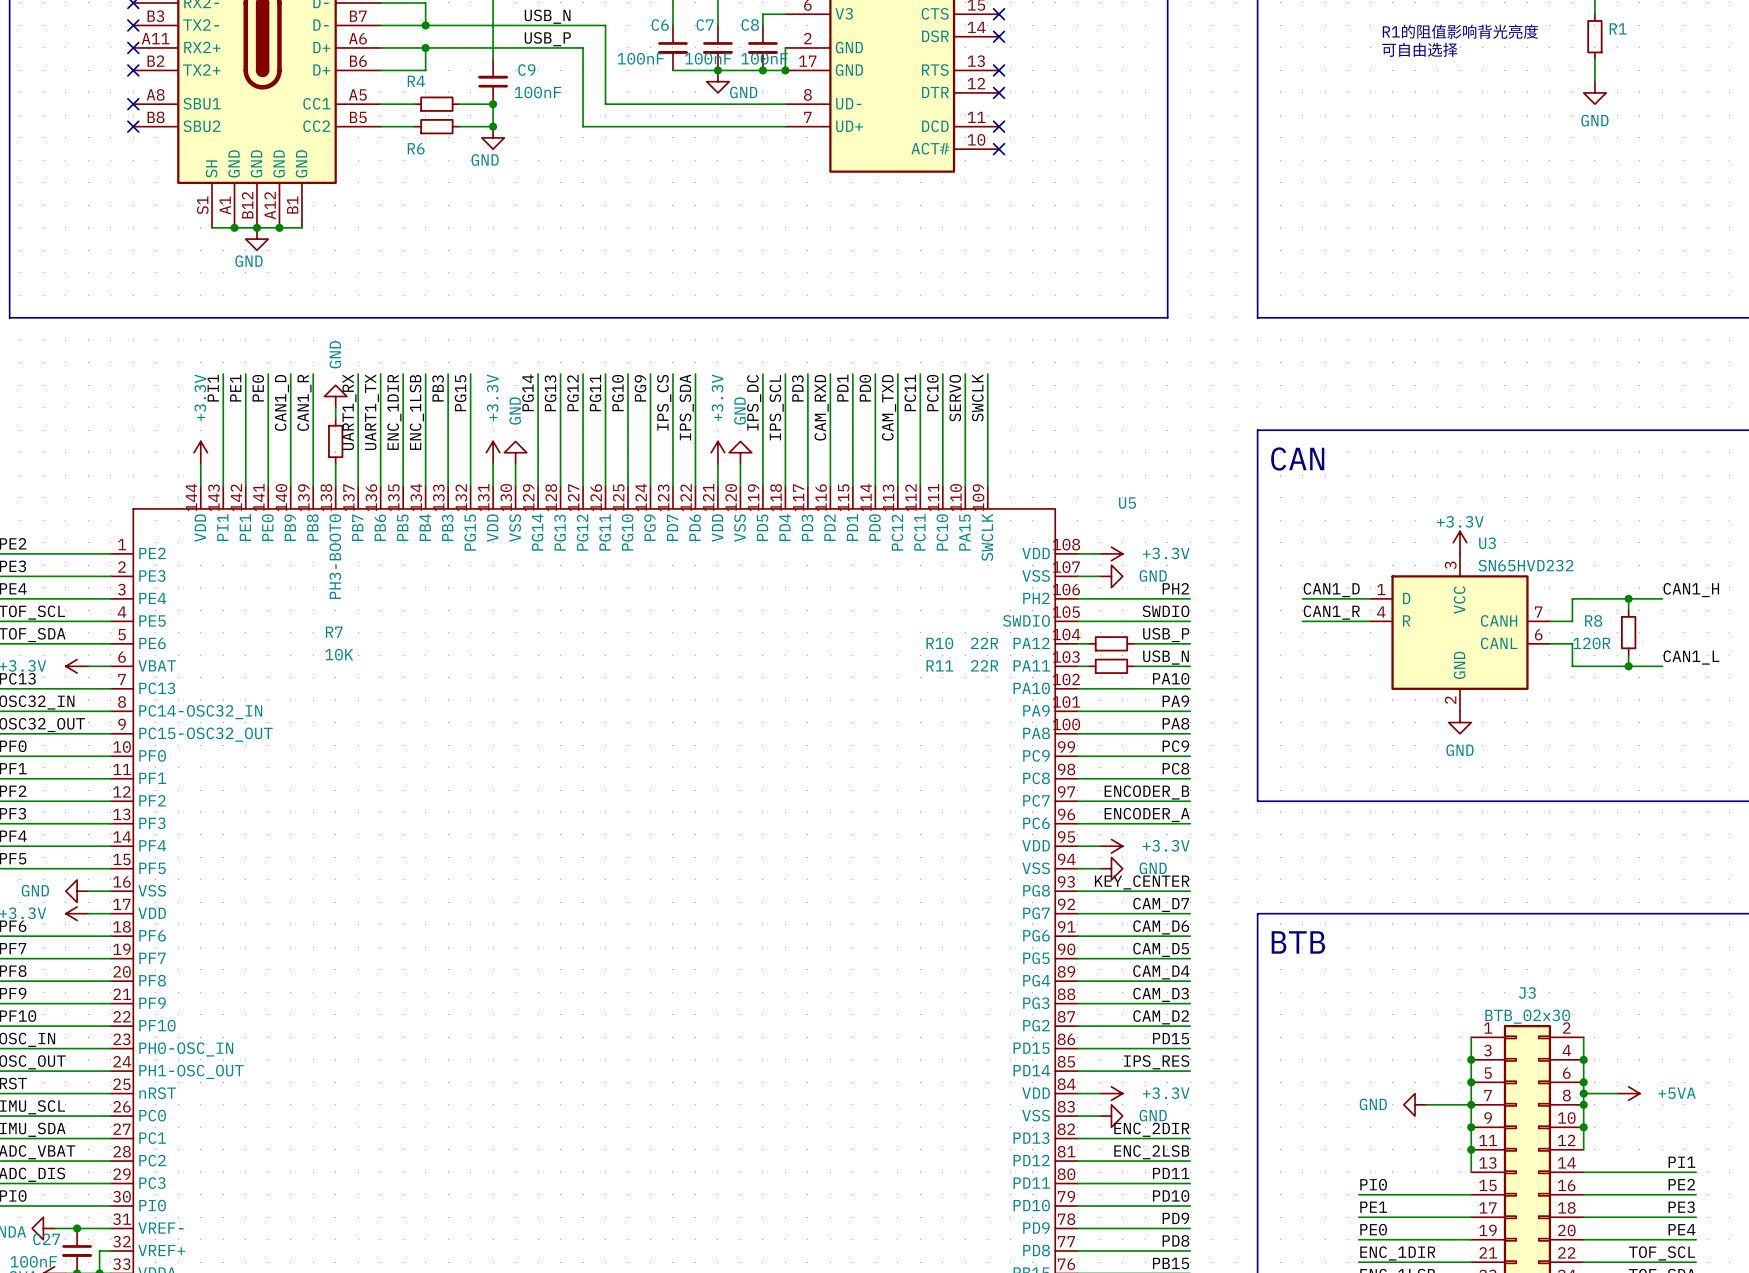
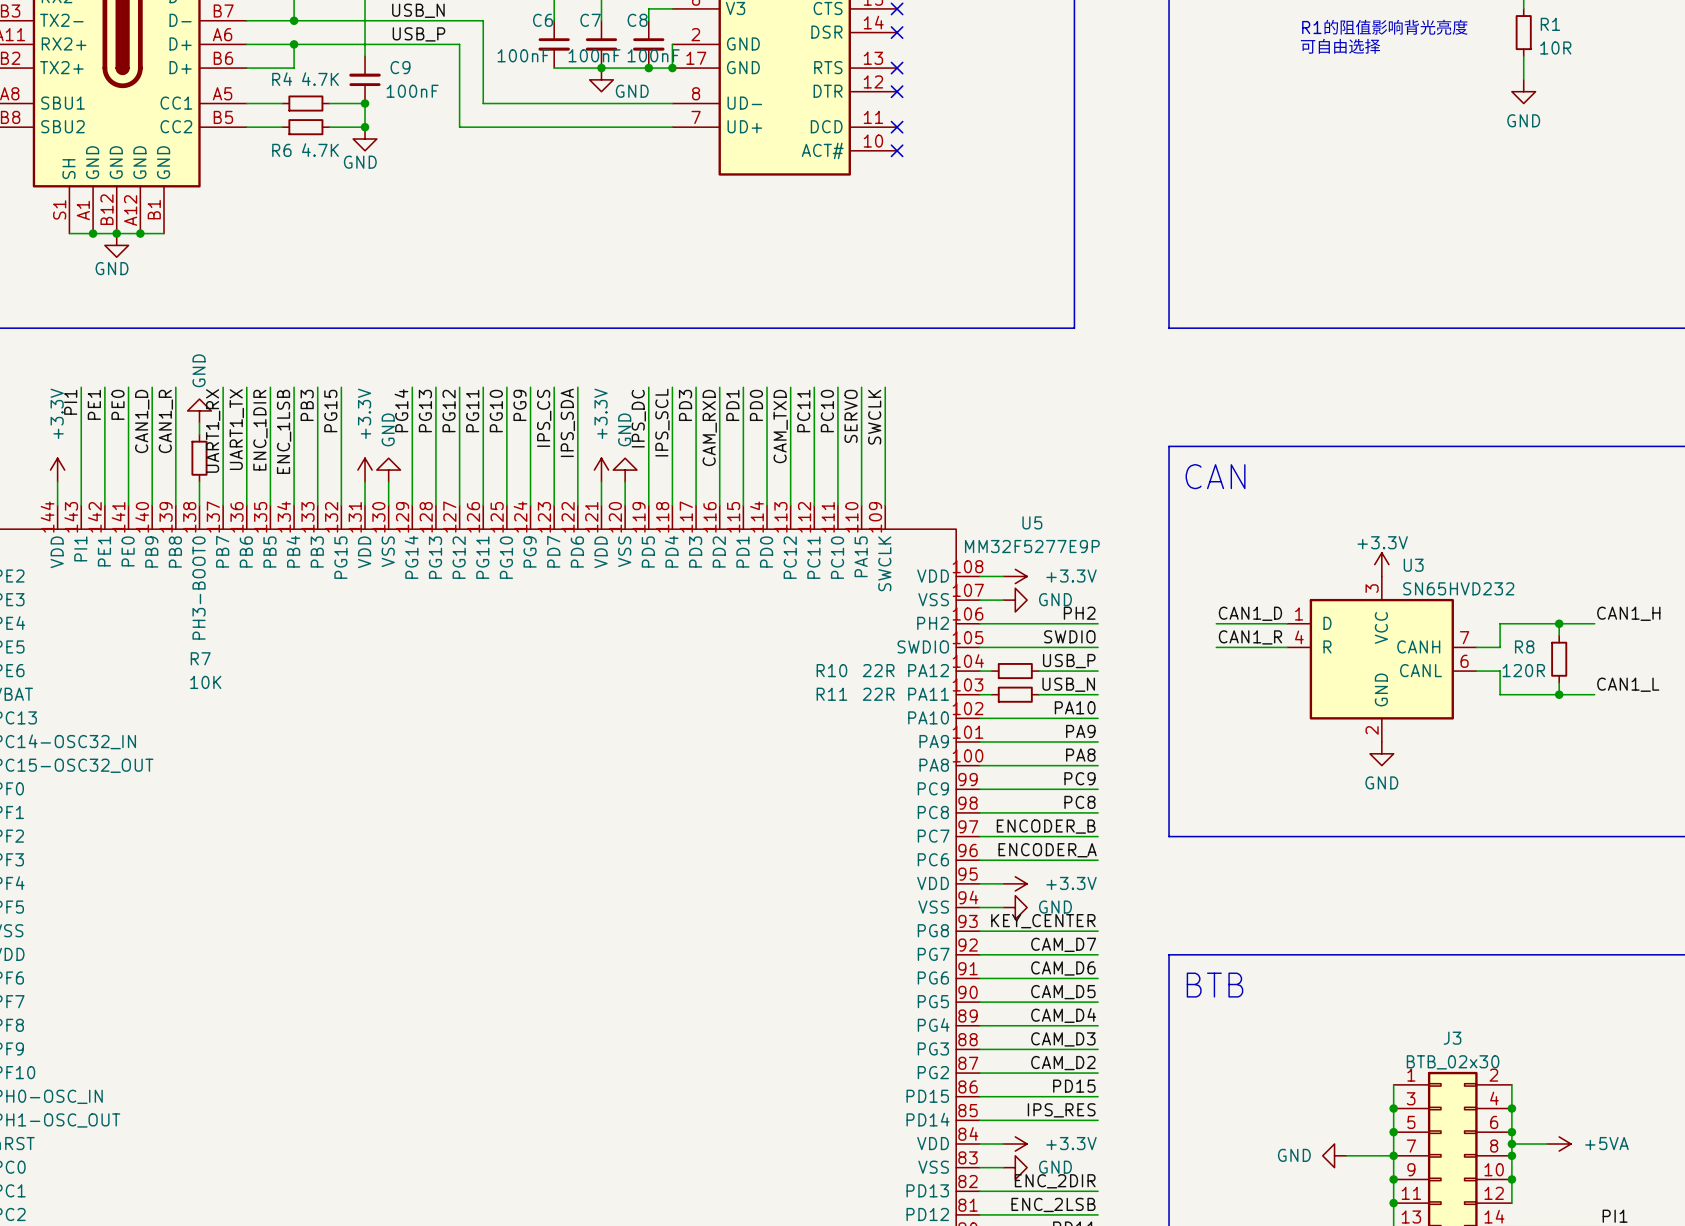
R1 value: none -> 10R (1555, 47)
R4 value: none -> 4.7K (320, 79)
R6 value: none -> 4.7K (320, 150)
U5 value: none -> MM32F5277E9P (1032, 546)

